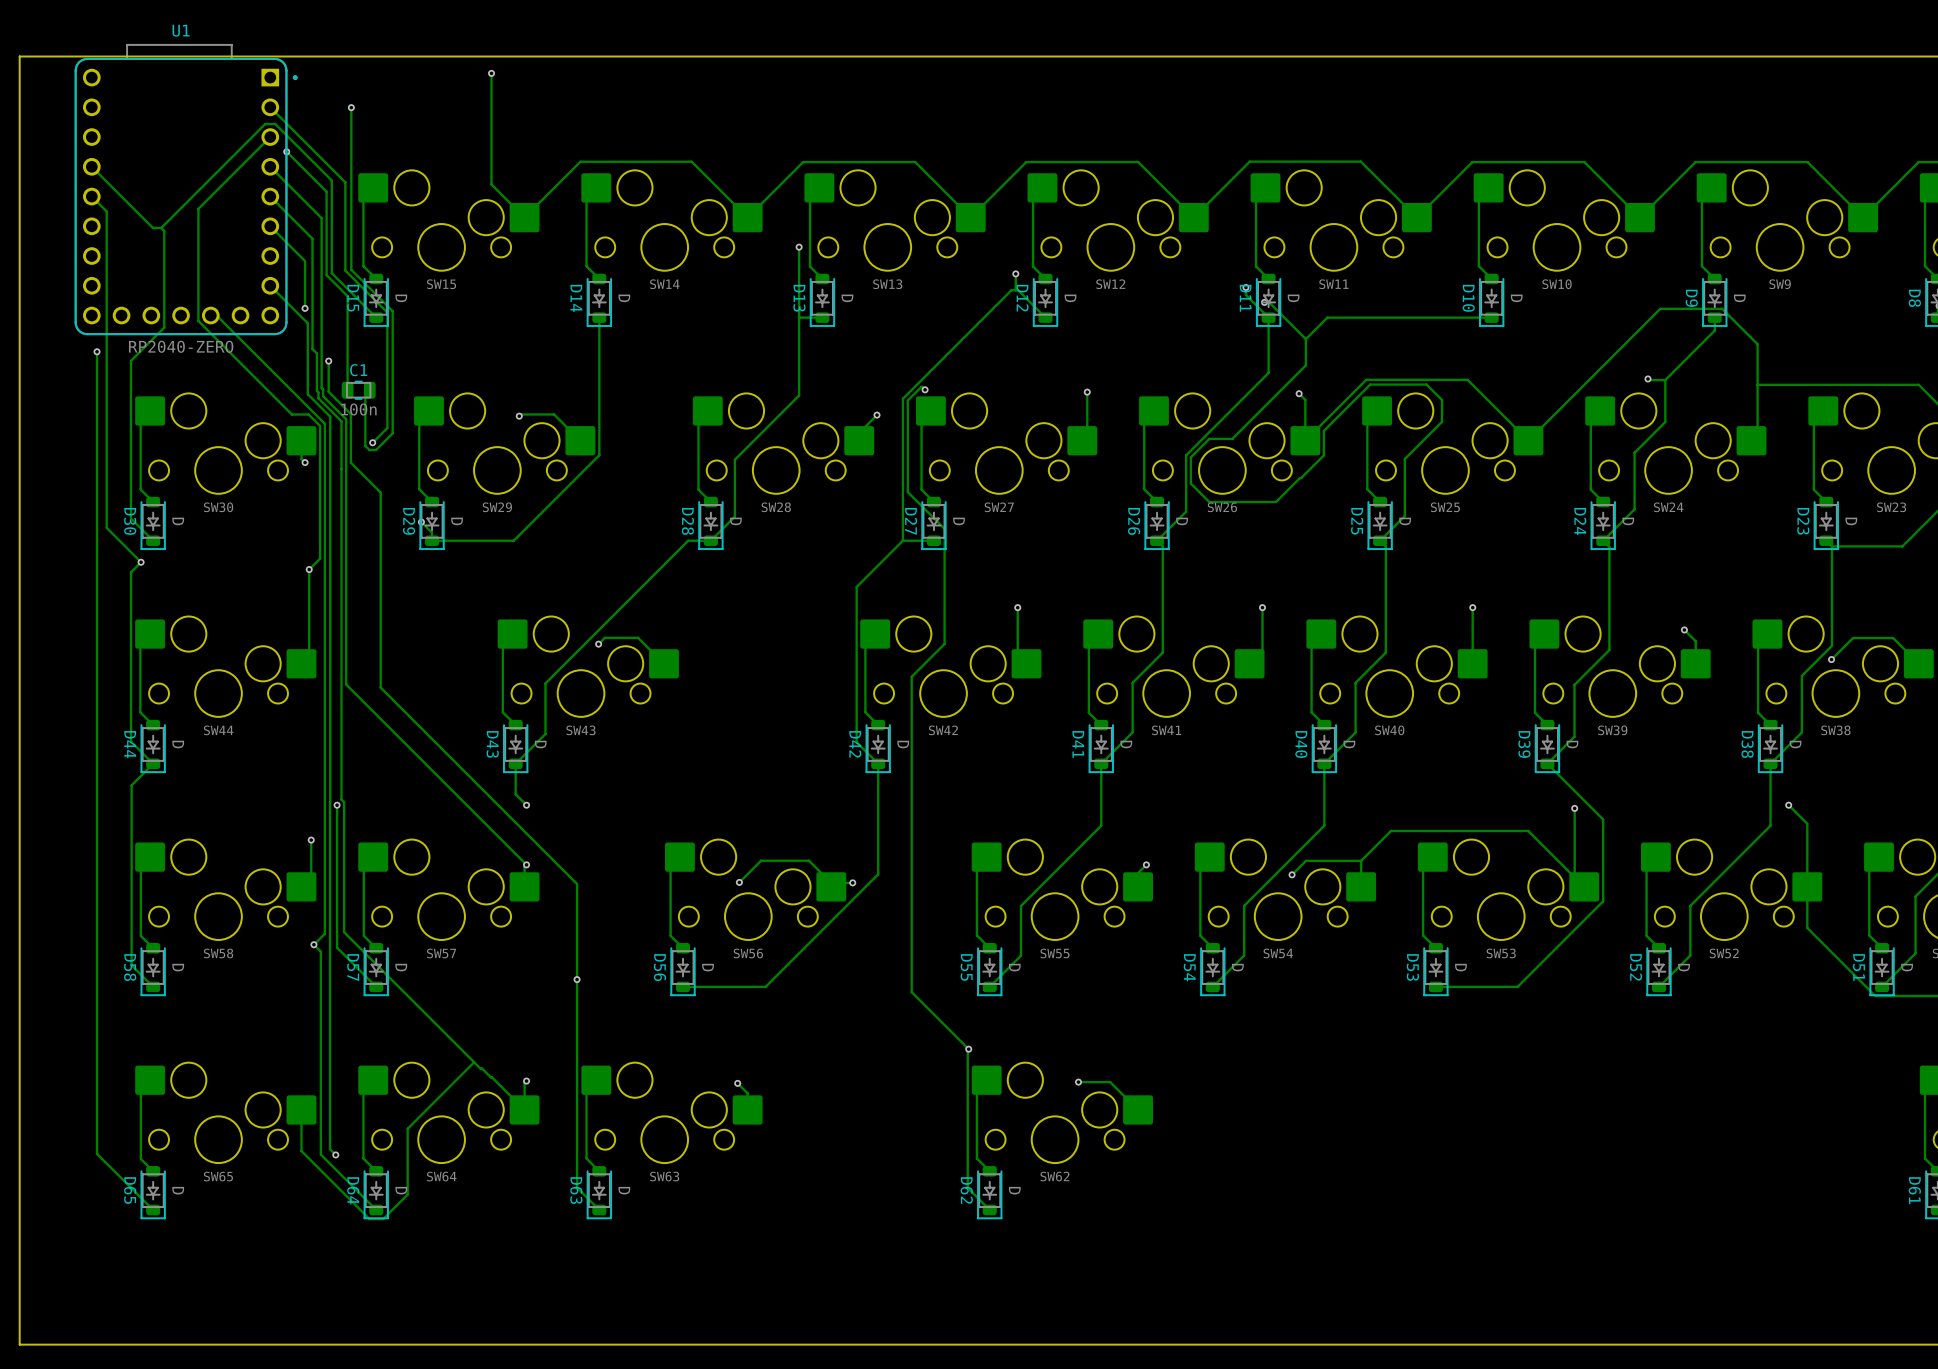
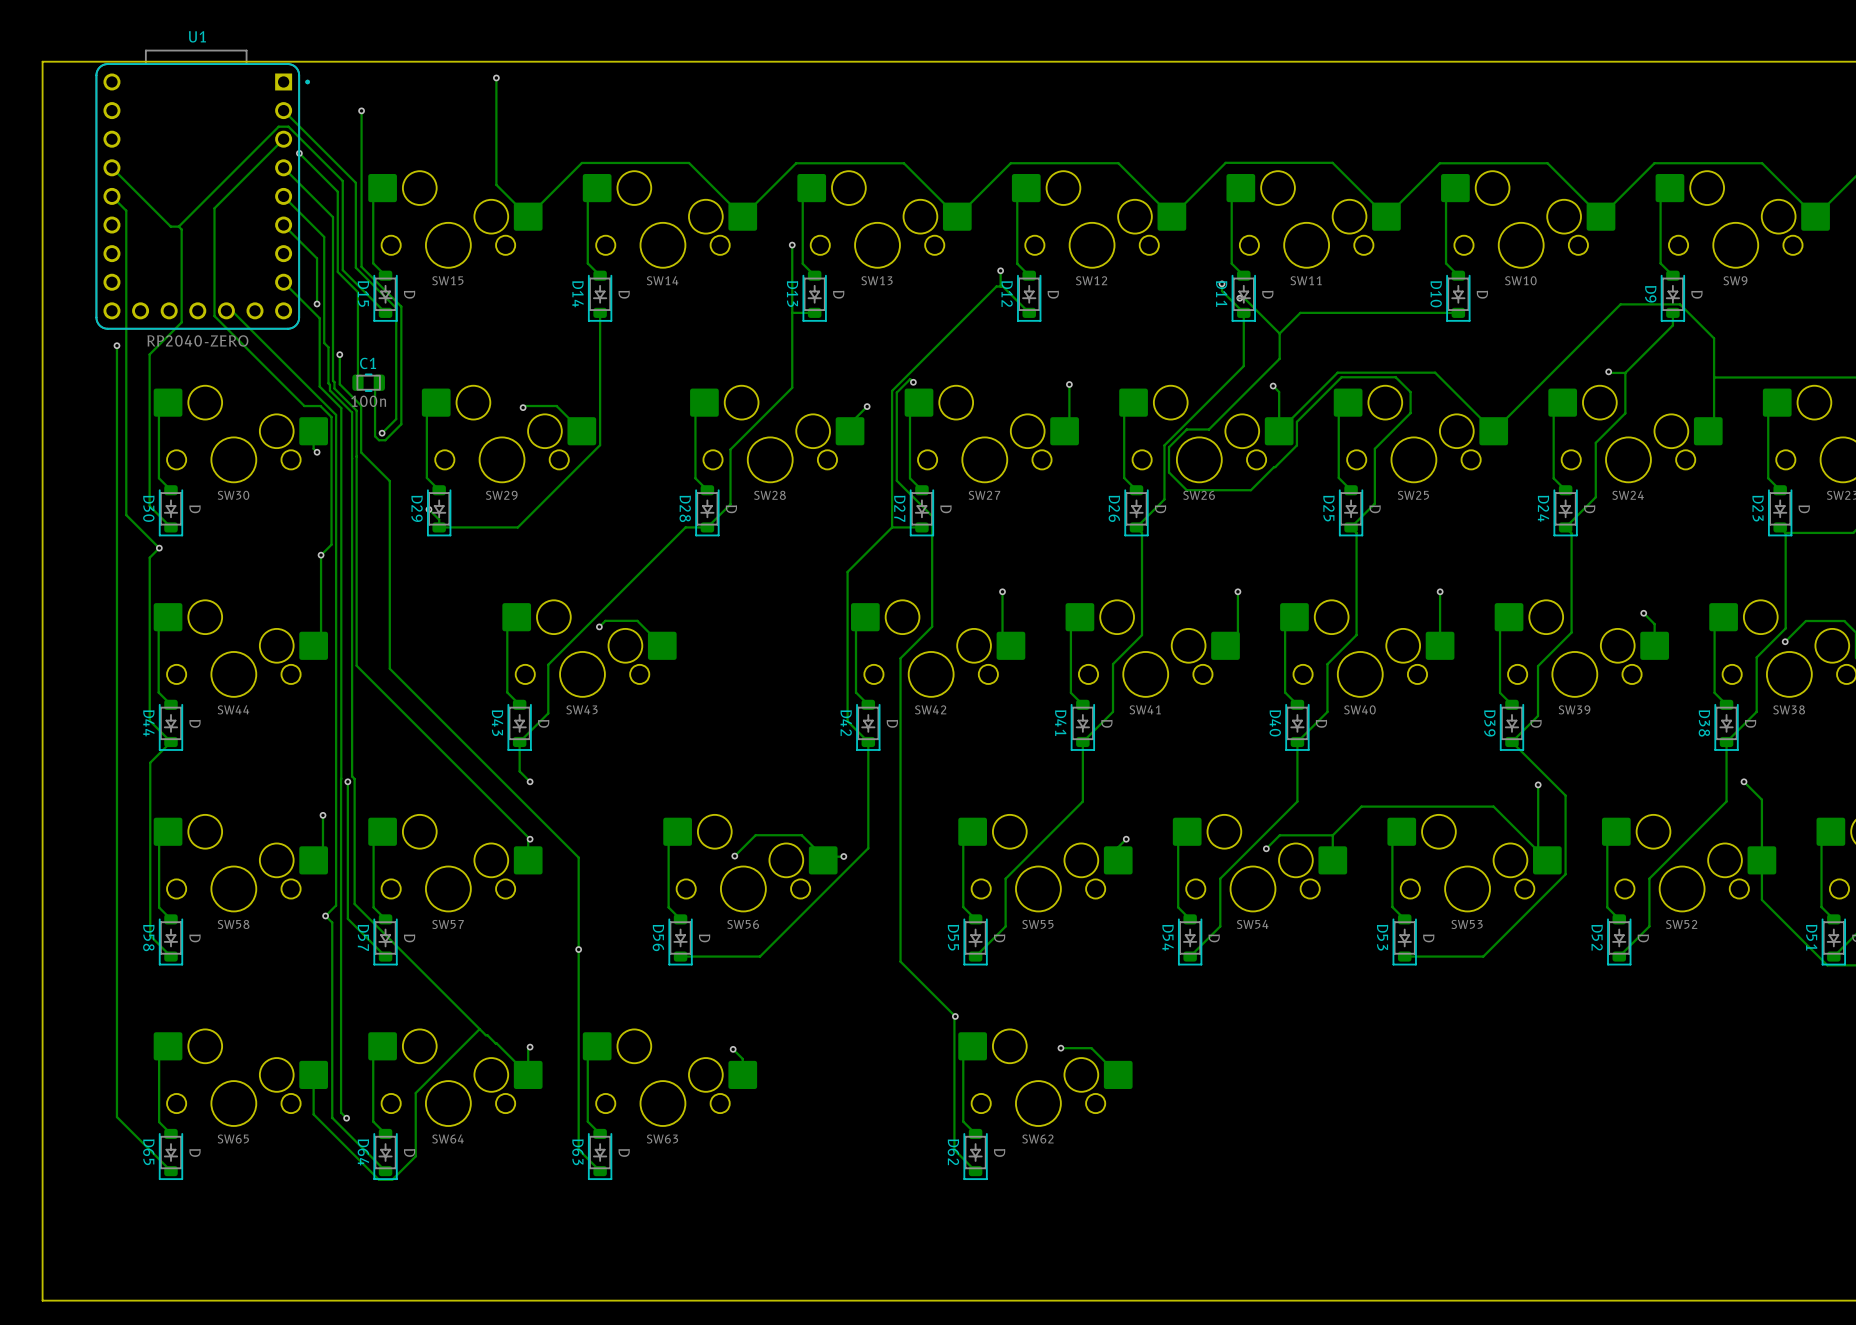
D29 value: D (457, 521) -> none

